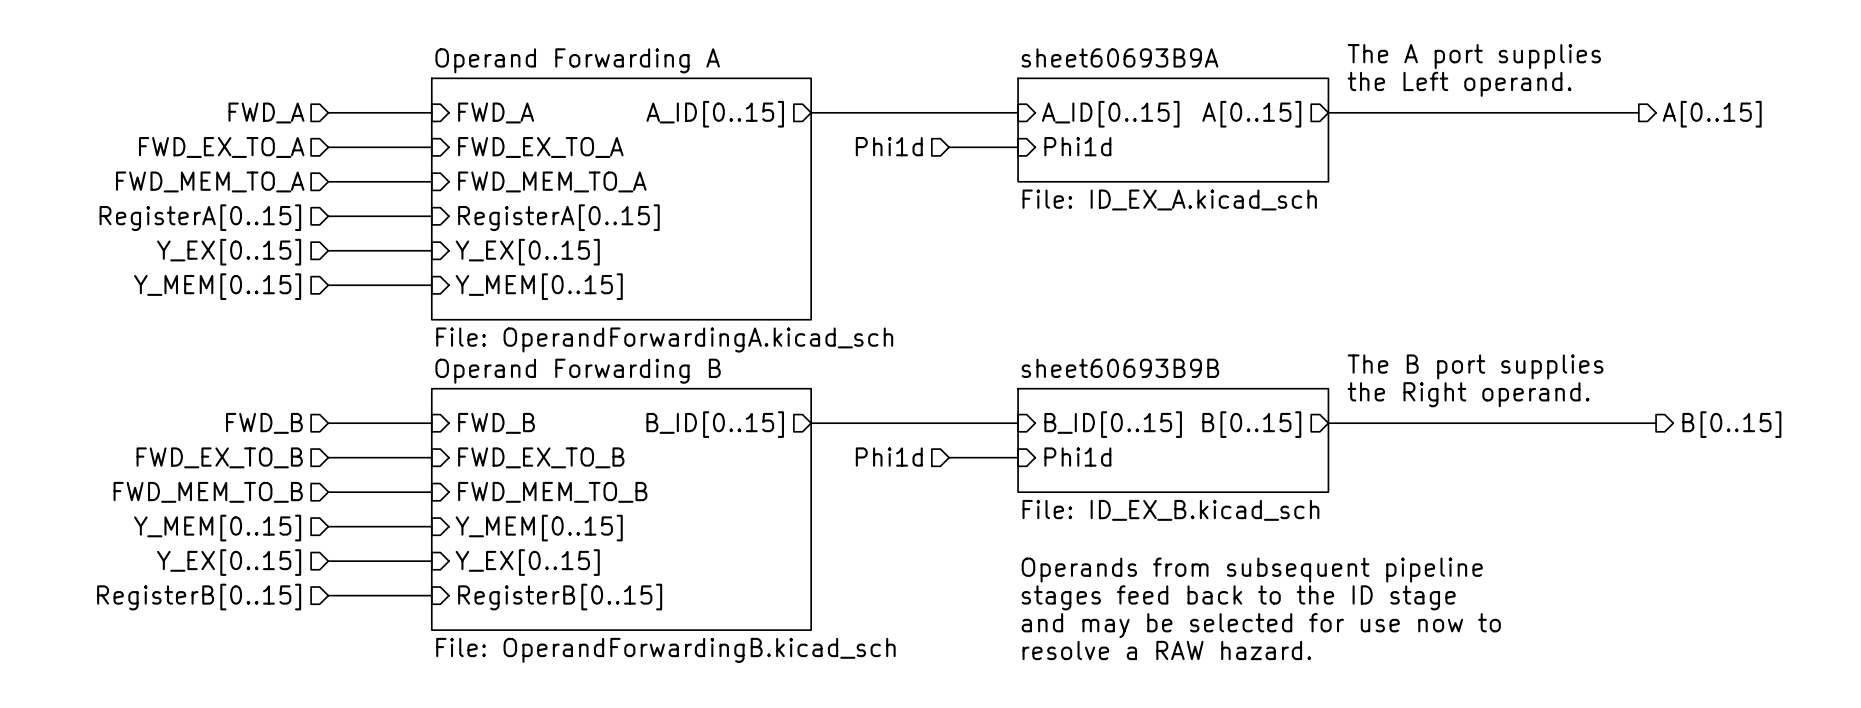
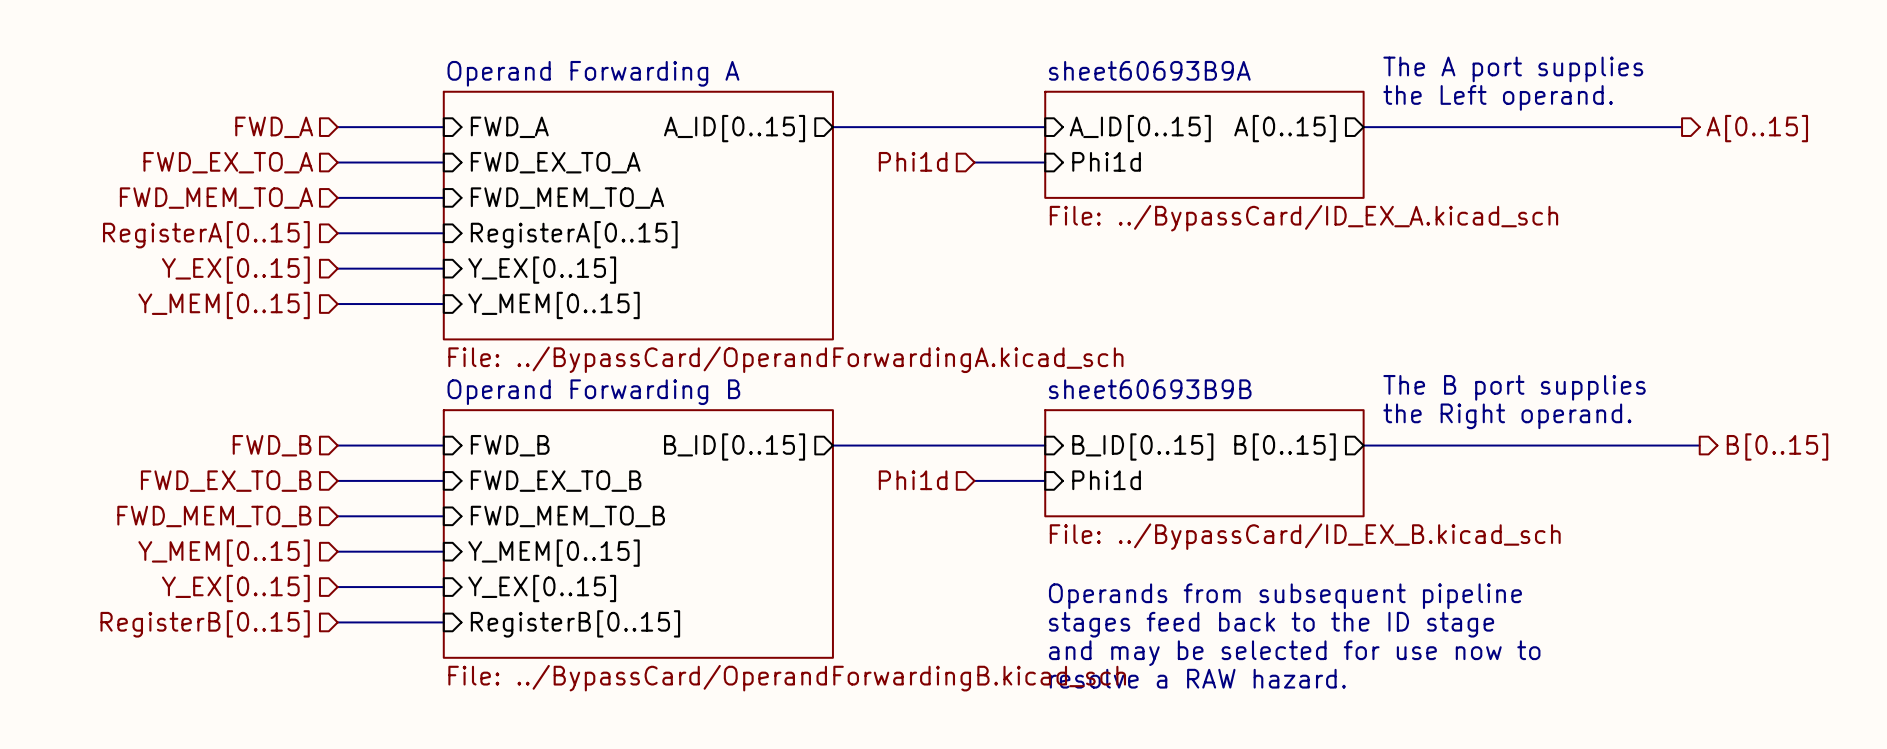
sheet sheet60693B9A value: File: ID_EX_A.kicad_sch (1169, 199) -> File: ../BypassCard/ID_EX_A.kicad_sch (1303, 218)
sheet Operand Forwarding A value: File: OperandForwardingA.kicad_sch (664, 339) -> File: ../BypassCard/OperandForwardingA.kicad_sch (785, 359)
sheet sheet60693B9B value: File: ID_EX_B.kicad_sch (1170, 510) -> File: ../BypassCard/ID_EX_B.kicad_sch (1305, 536)
sheet Operand Forwarding B value: File: OperandForwardingB.kicad_sch (665, 650) -> File: ../BypassCard/OperandForwardingB.kicad_sch (787, 678)

